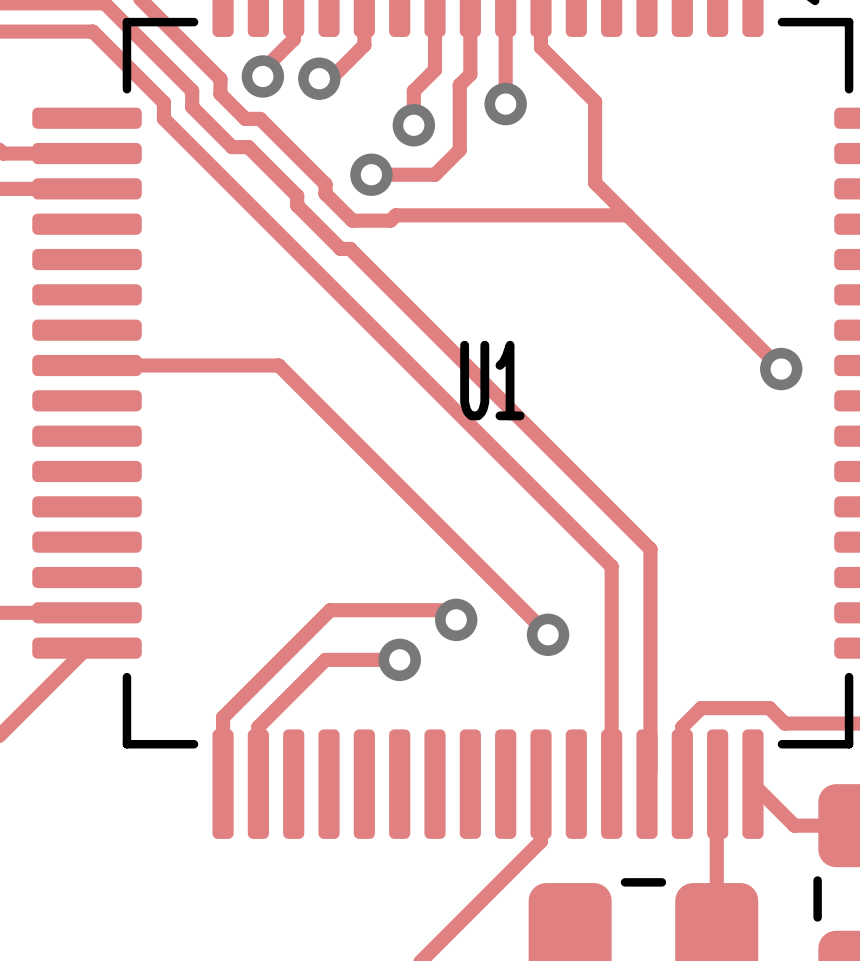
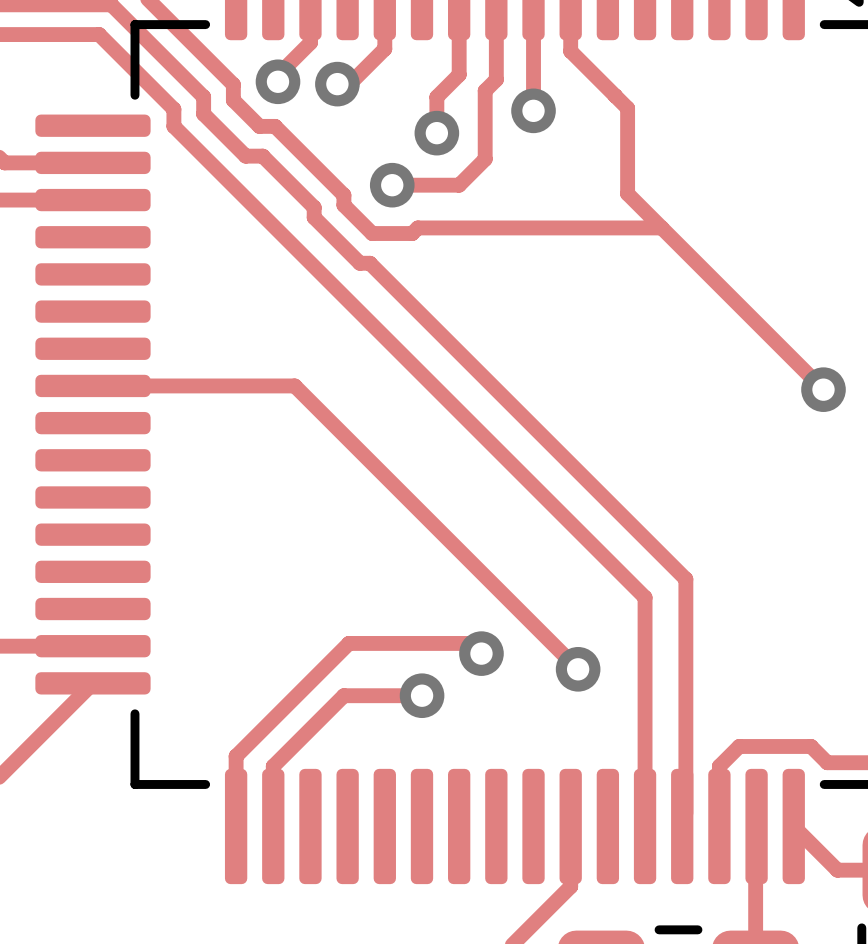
U1 name: U1 (492, 380) -> none

